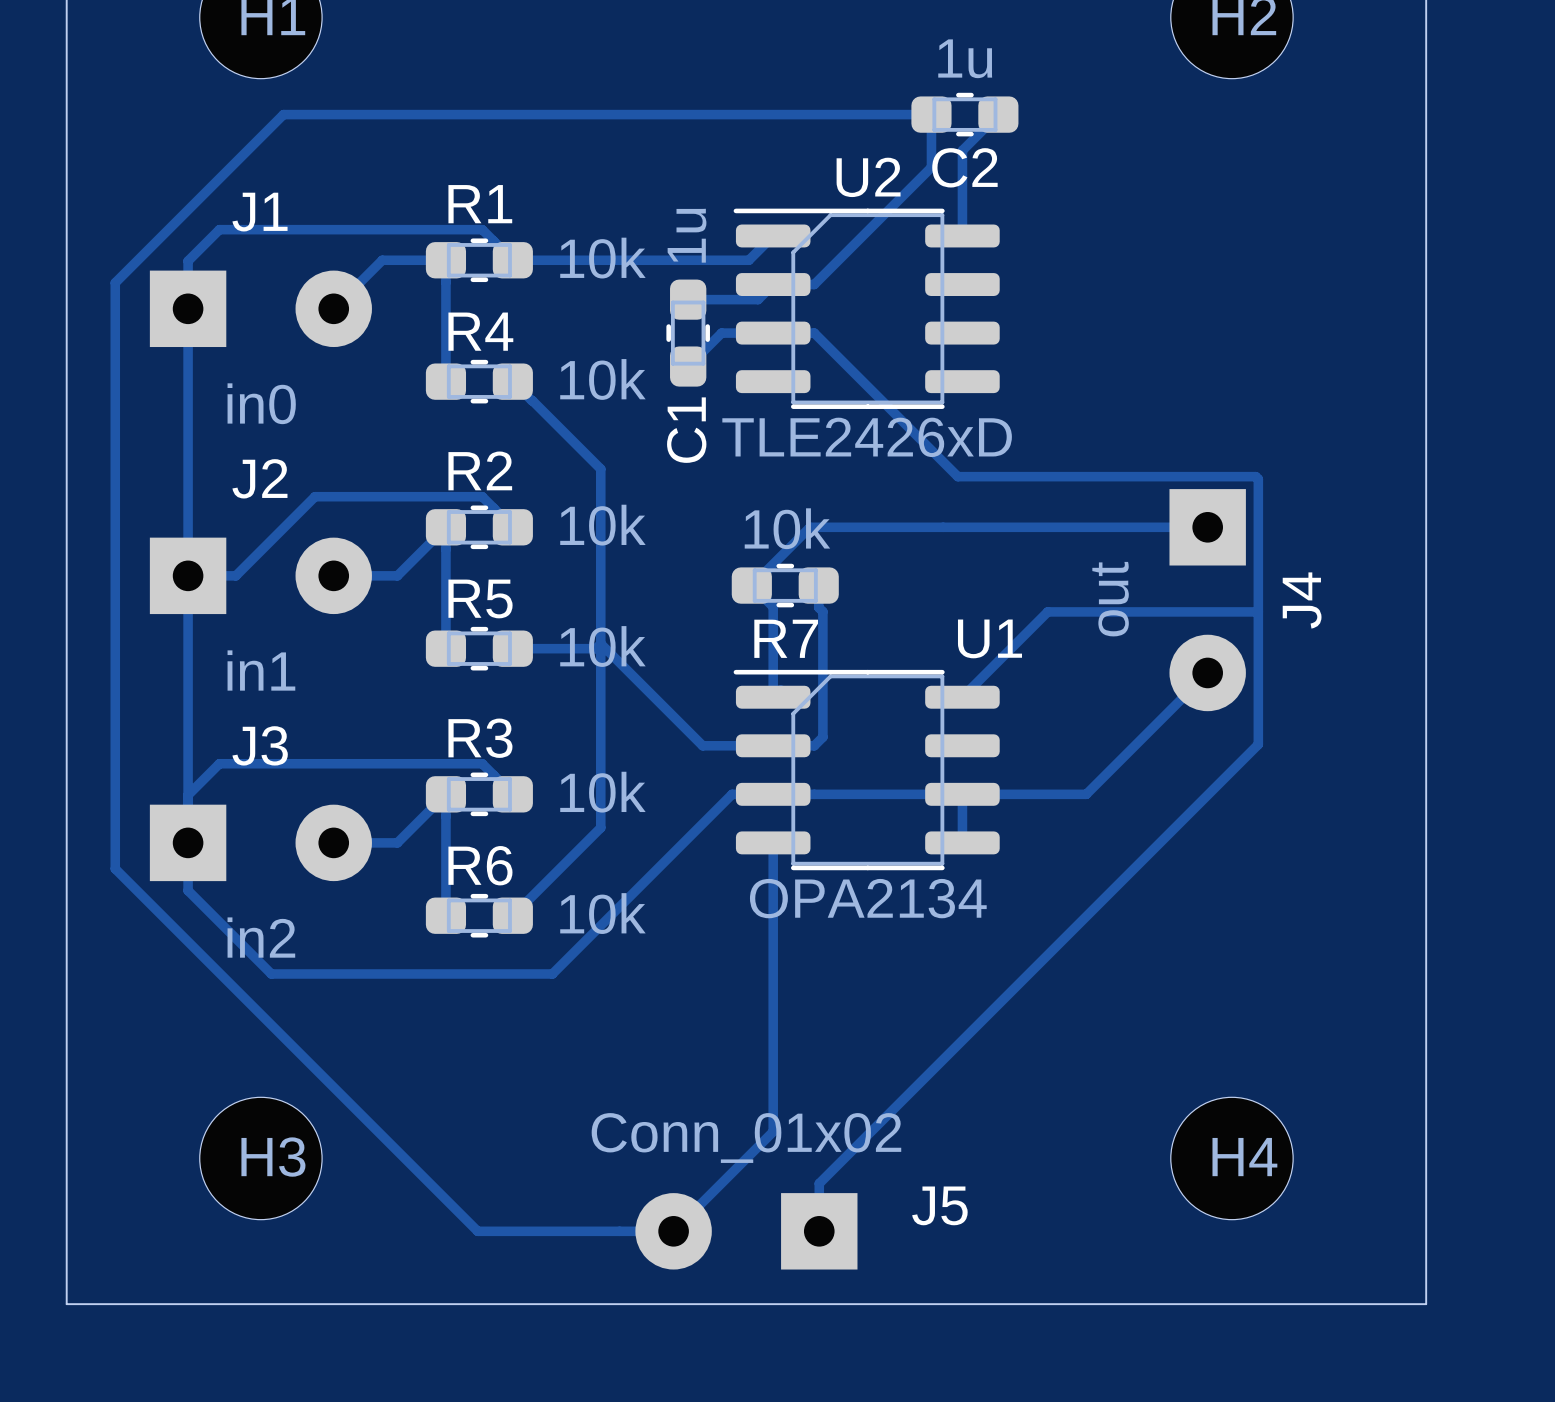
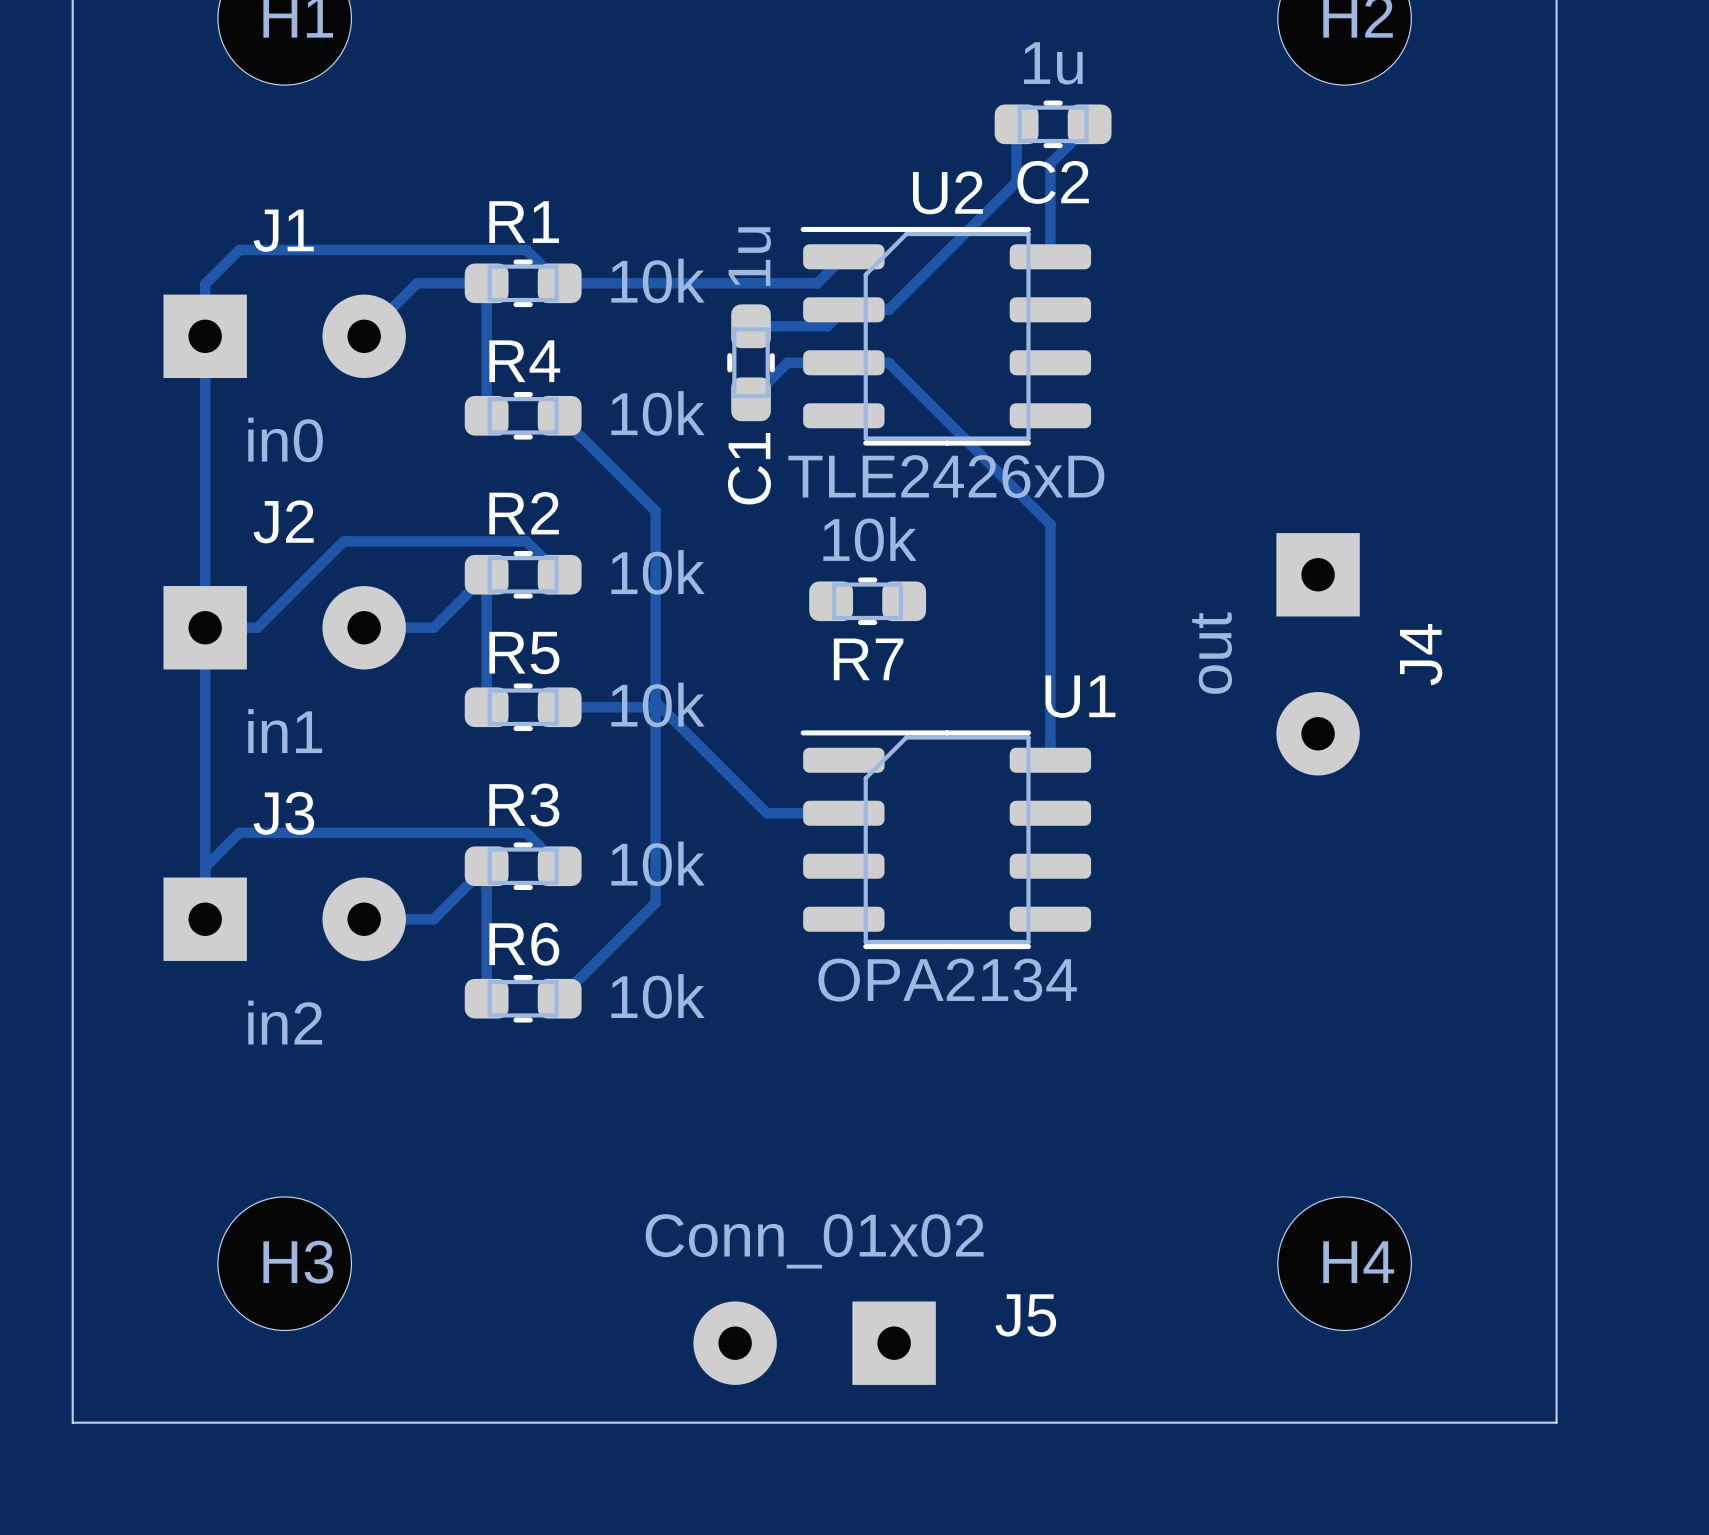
track: (931, 114) (283, 114) (115, 282) (115, 868) (477, 1231) (673, 1231) (773, 1131) (773, 842) -> none
track: (957, 476) (1255, 476) (1258, 479) (1258, 744) (819, 1183) (819, 1231) -> none
track: (1207, 527) (810, 527) (751, 585) (773, 606) (773, 697) (780, 689) -> none
R7 position: (785, 585) -> (867, 601)
track: (818, 585) (818, 607) (822, 611) (822, 737) (814, 745) (773, 745) -> none
track: (1258, 611) (1047, 611) (962, 697) -> (1045, 519) (1050, 524) (1050, 760)
track: (1207, 672) (1086, 794) (732, 794) (552, 973) (271, 973) (188, 890) (188, 842) -> none
track: (962, 794) (962, 842) -> none

